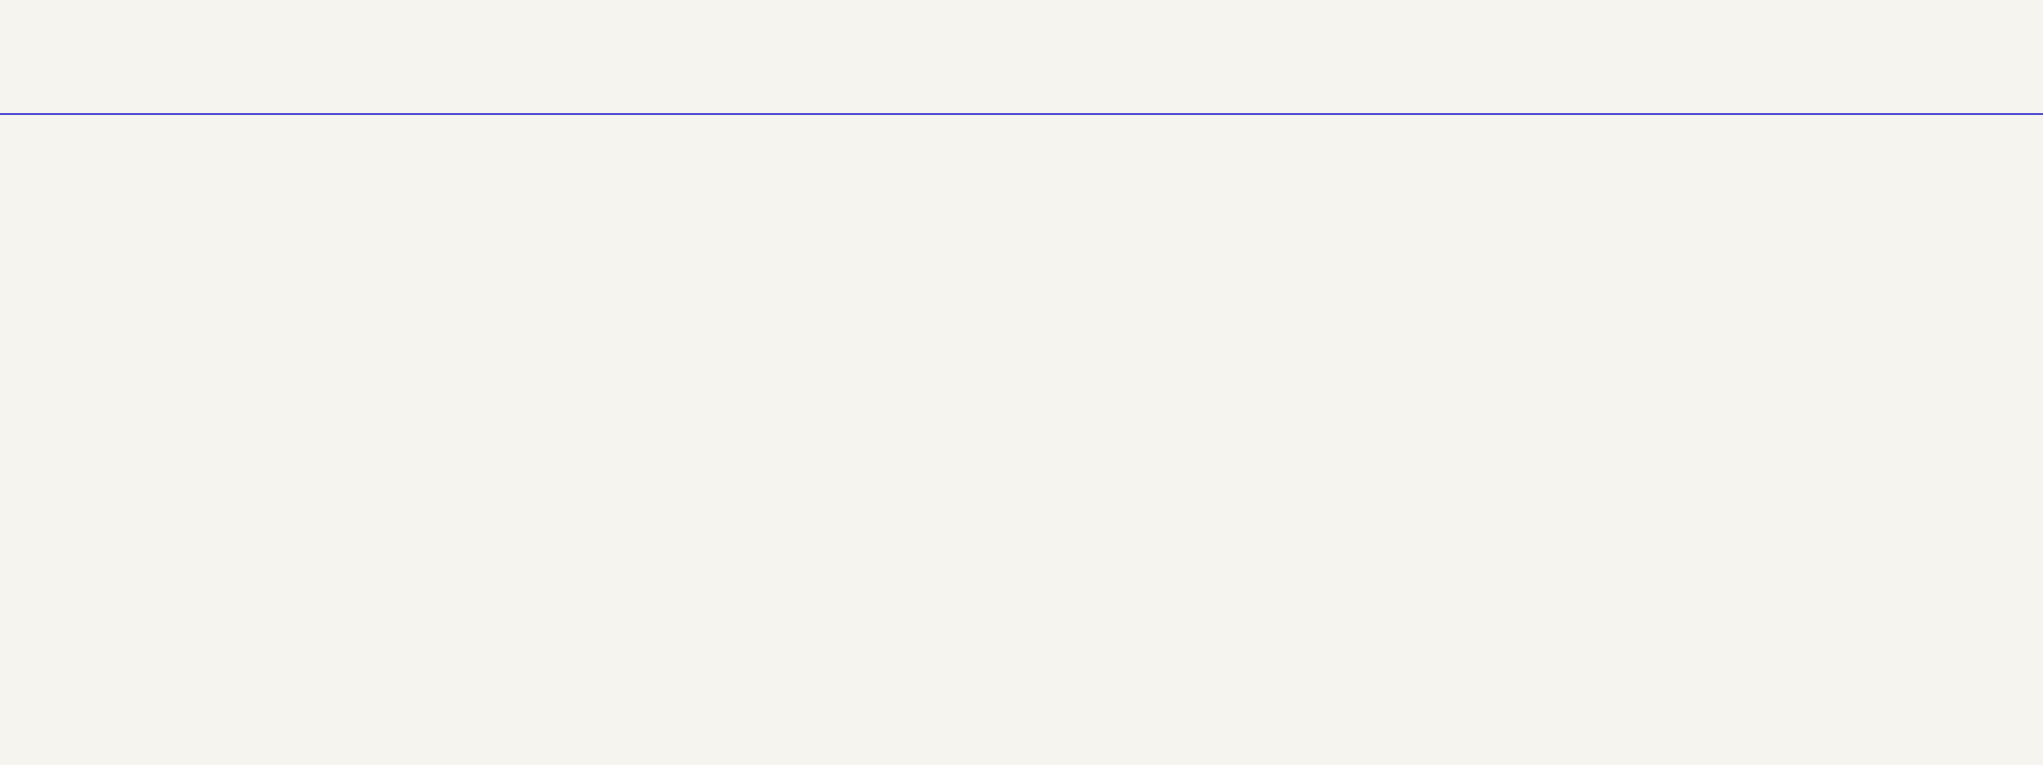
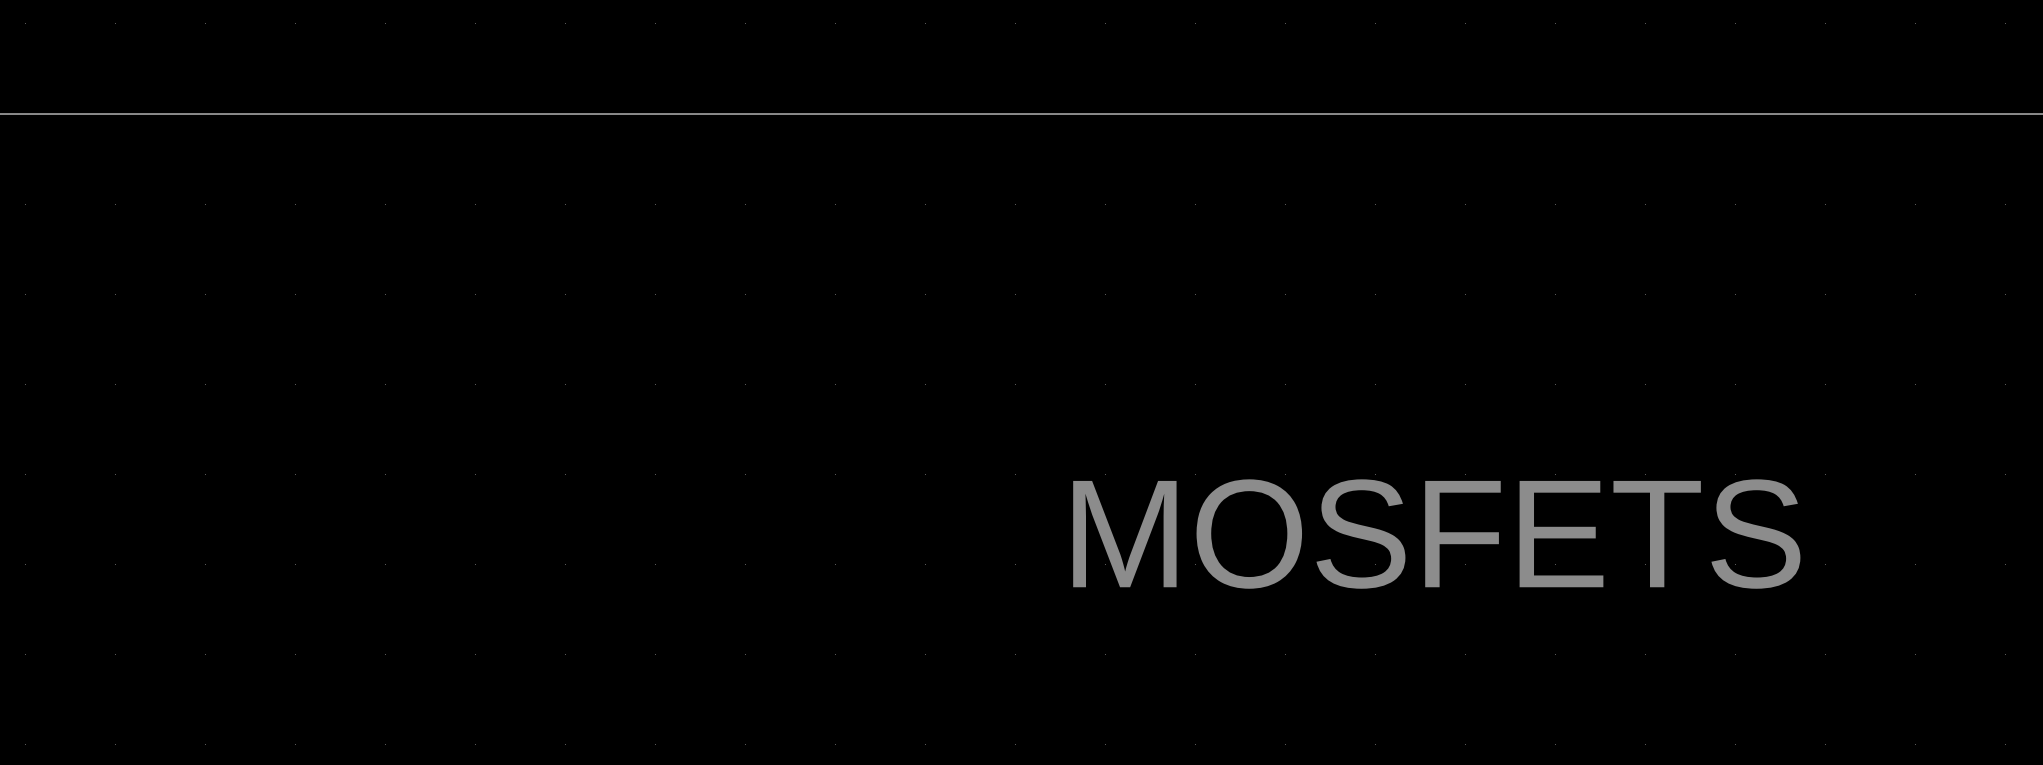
text: none -> MOSFETS (1436, 534)

